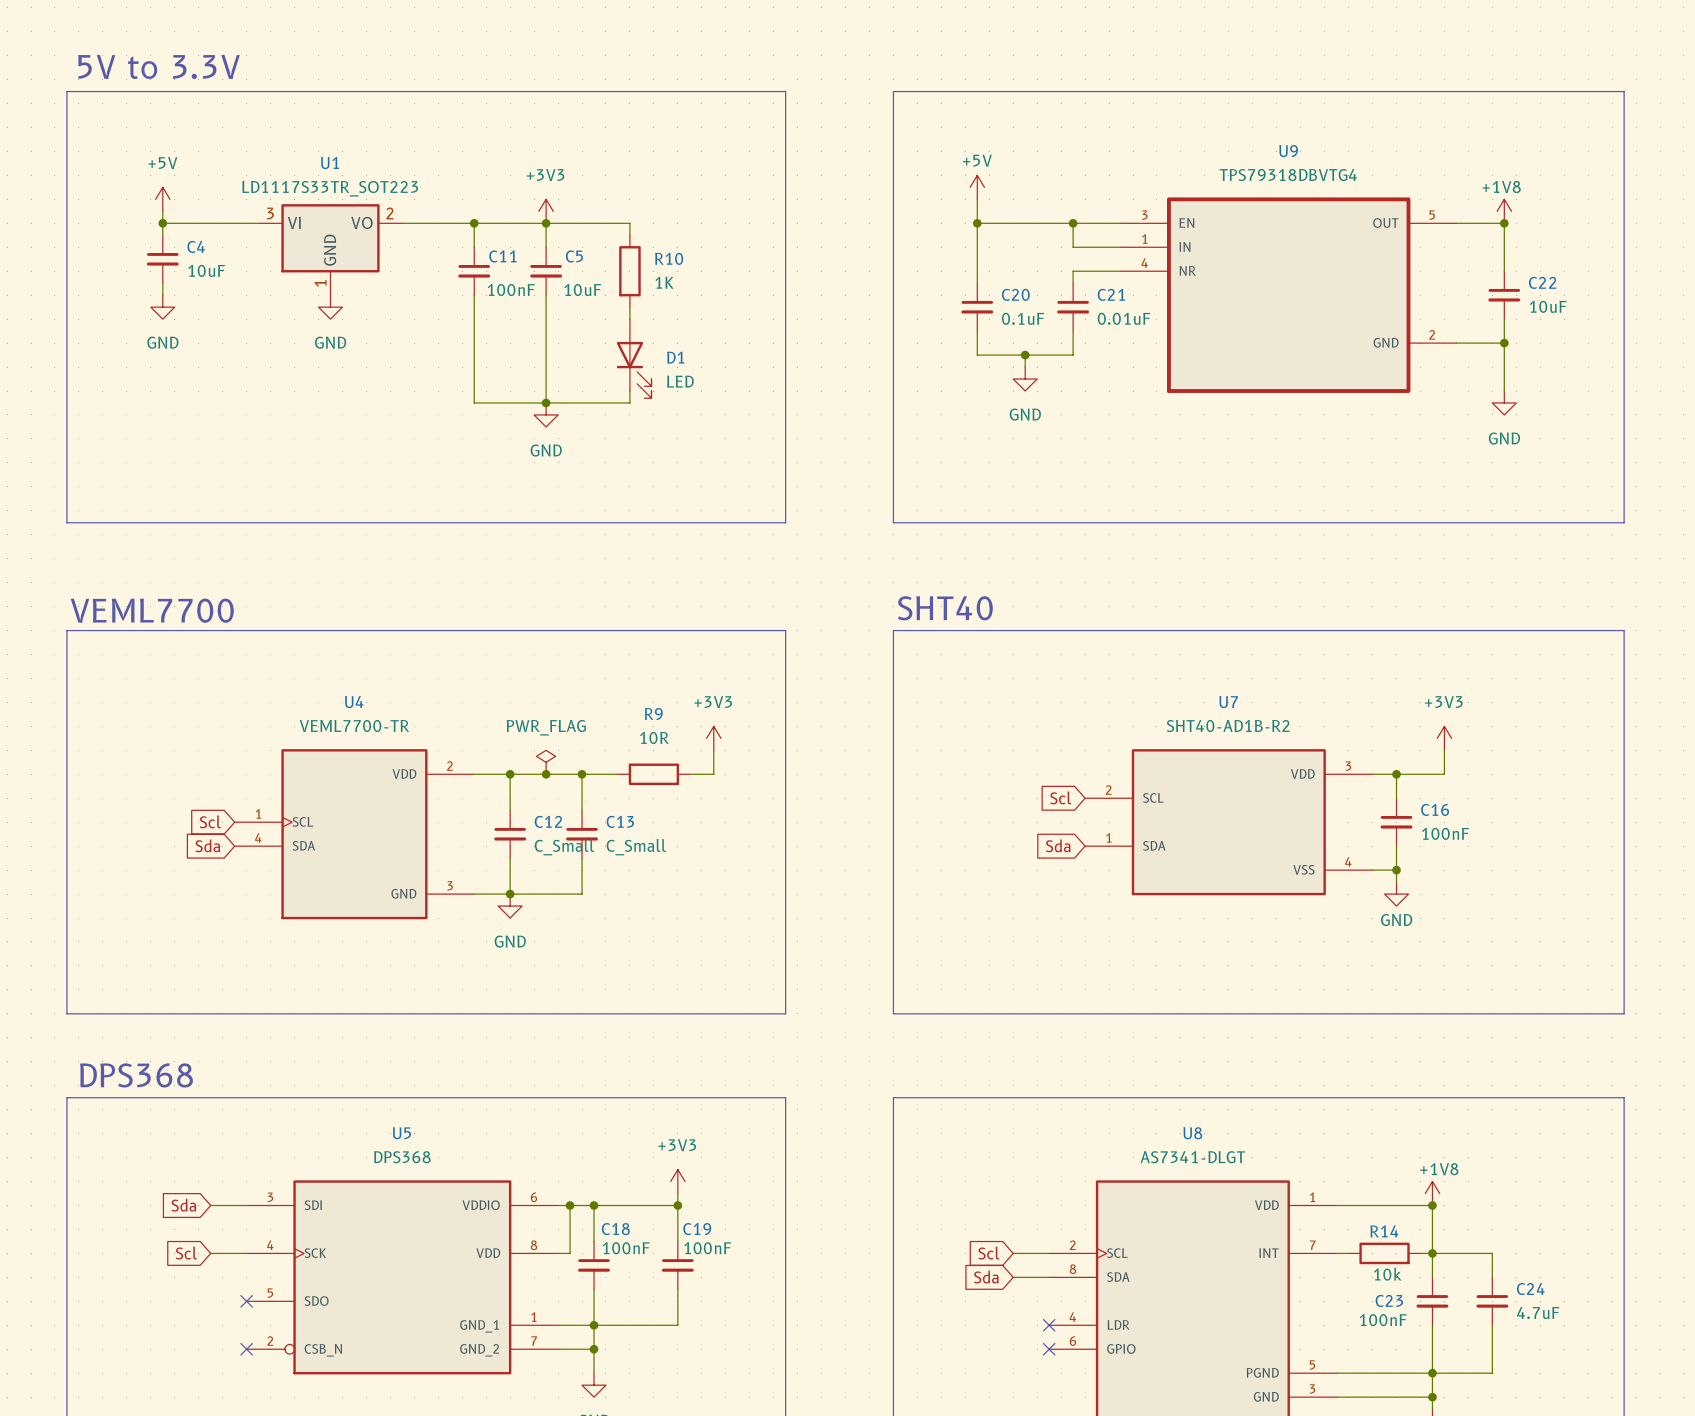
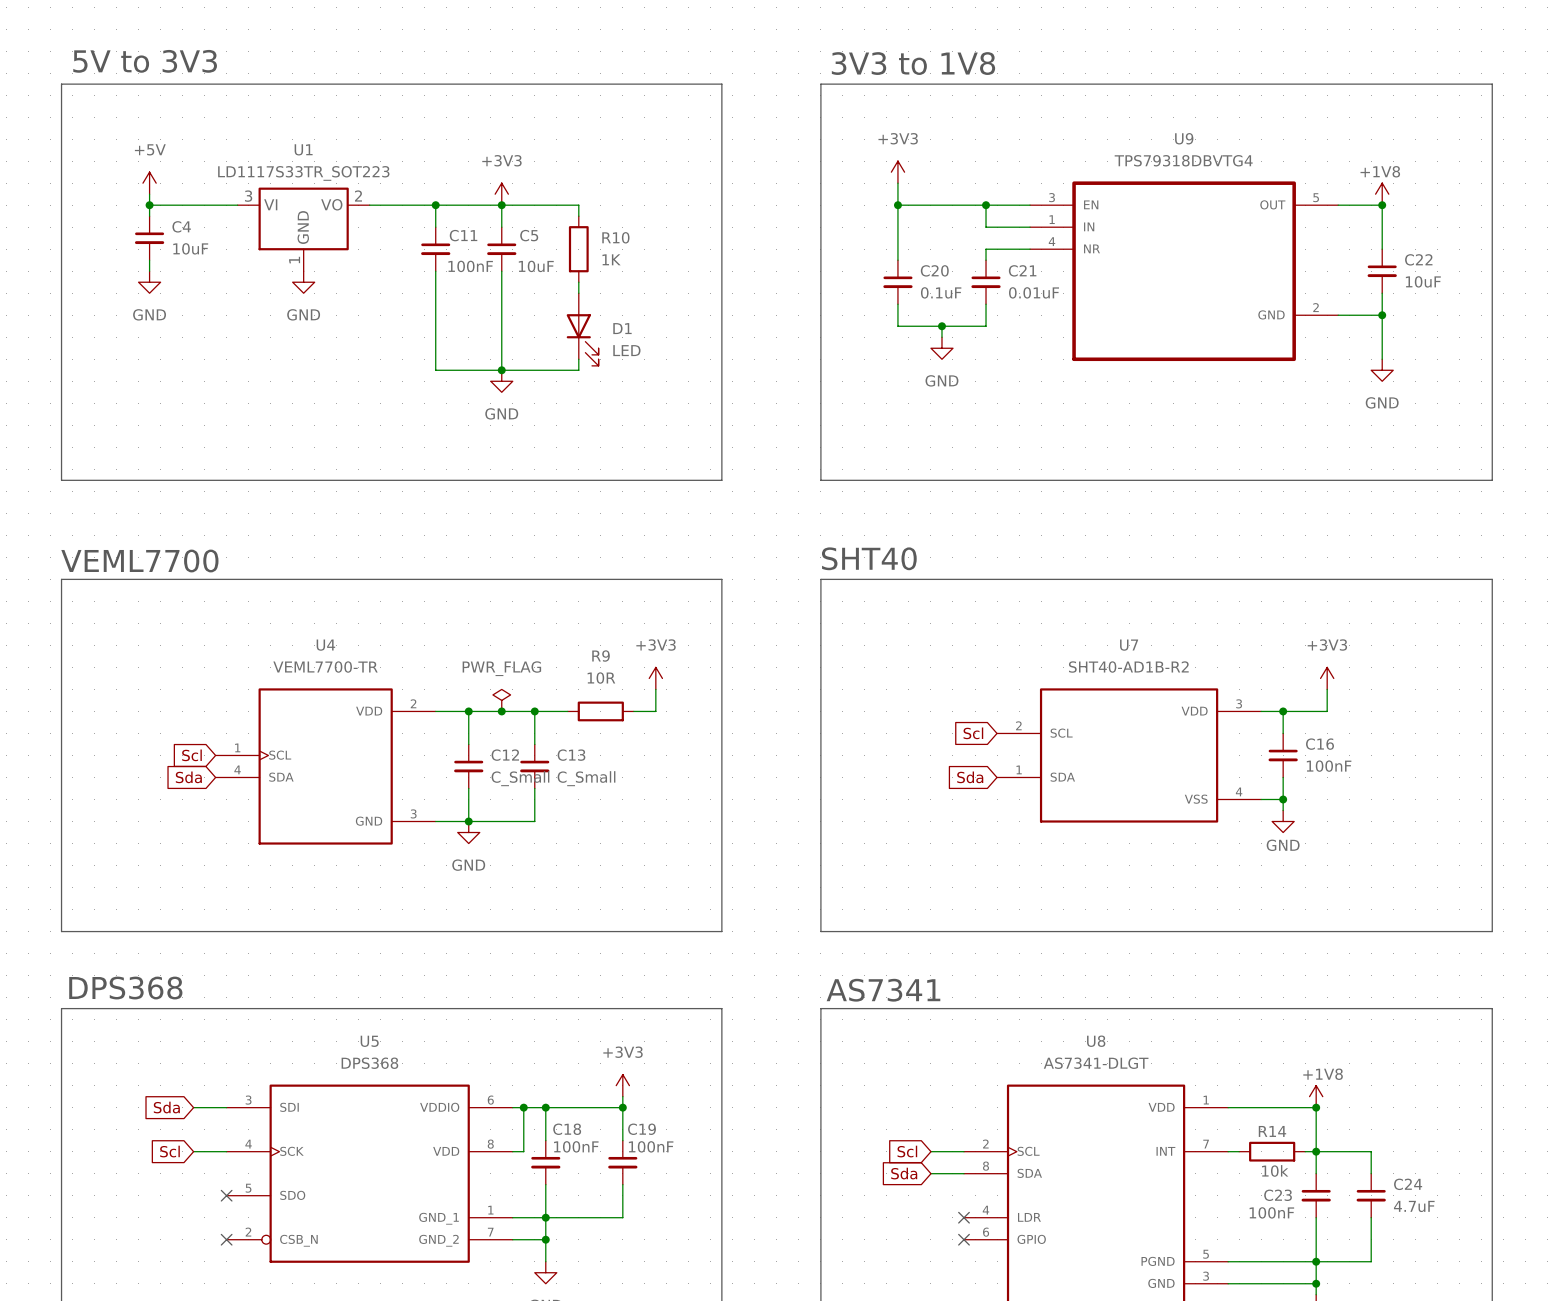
text: 5V to 3.3V (159, 66) -> 5V to 3V3 (145, 61)
text: none -> 3V3 to 1V8 (913, 63)
power symbol: +5V (977, 187) -> +3V3 (897, 172)
text: none -> AS7341 (883, 990)

